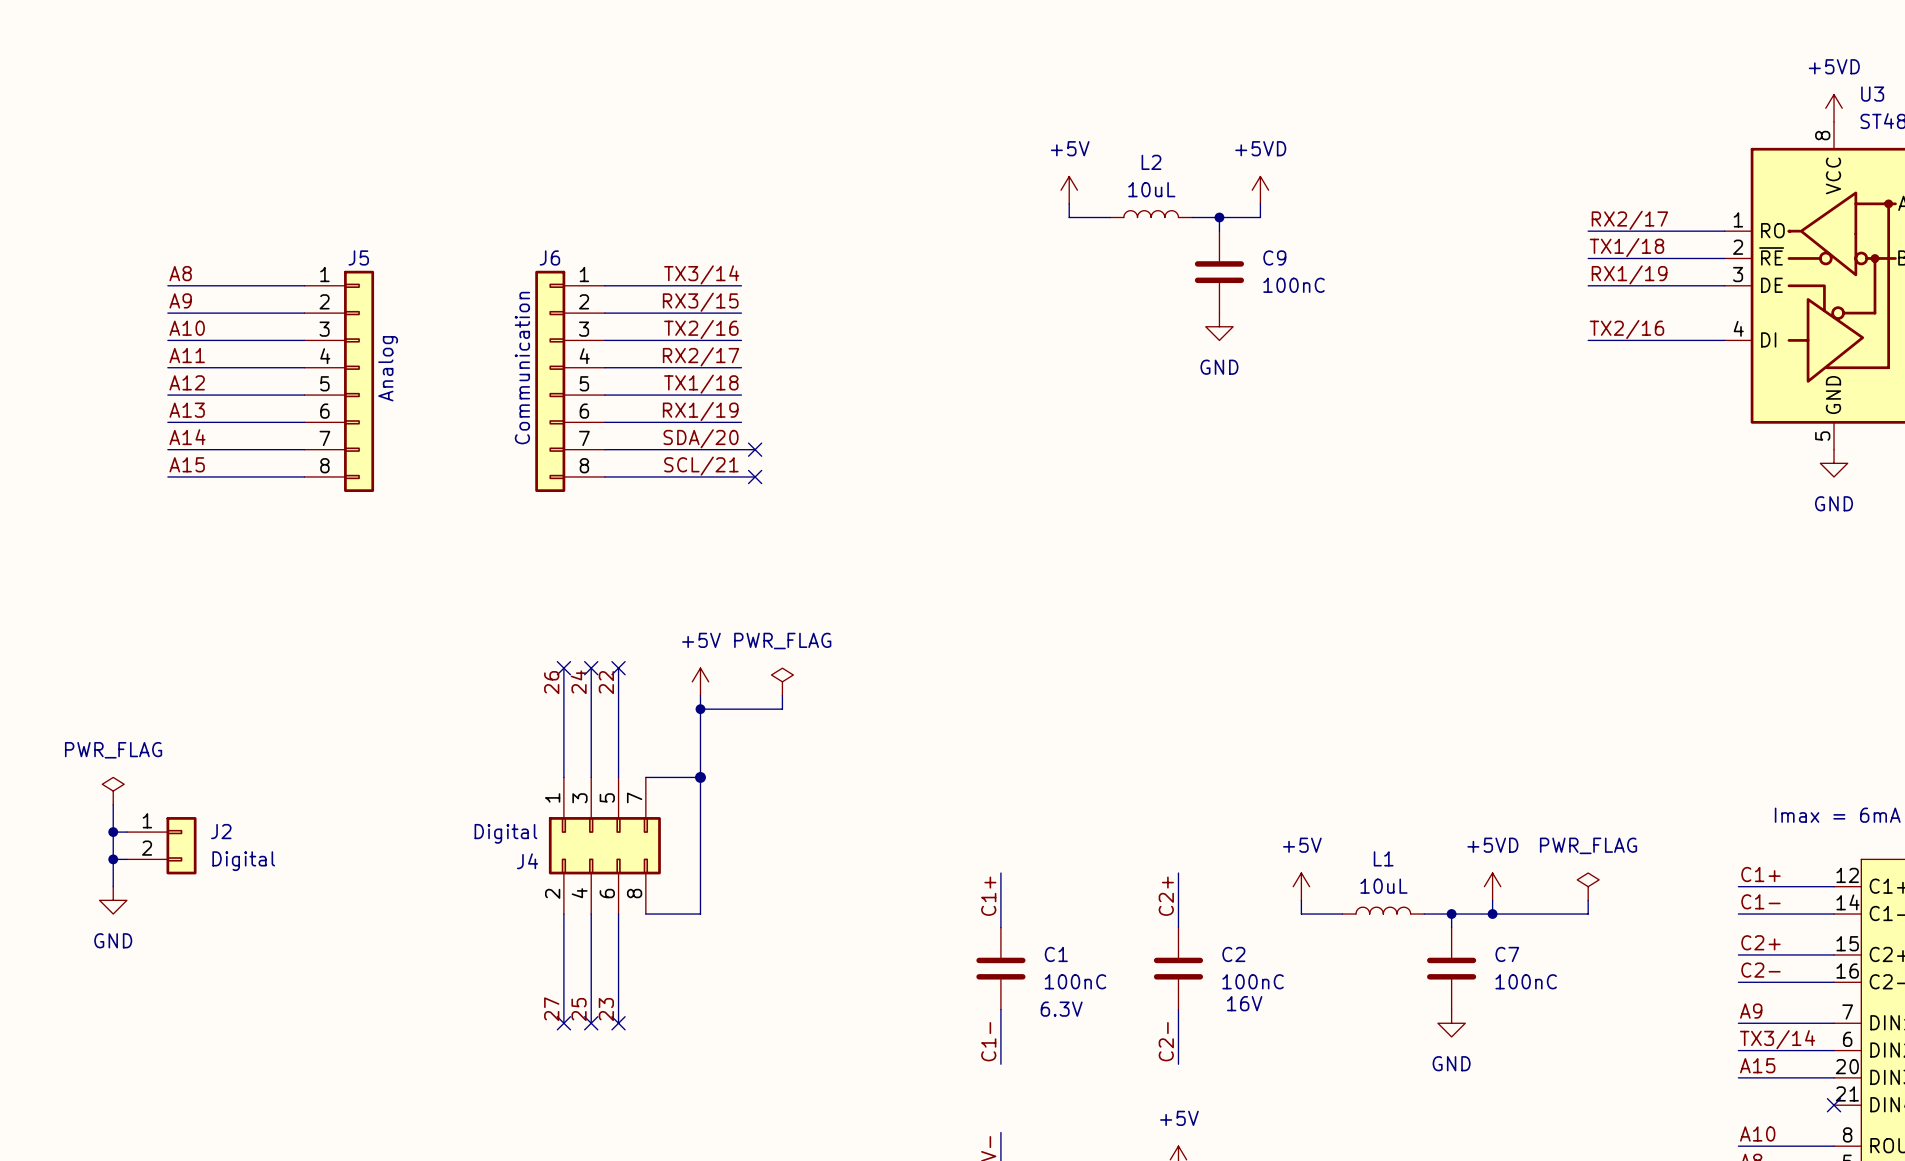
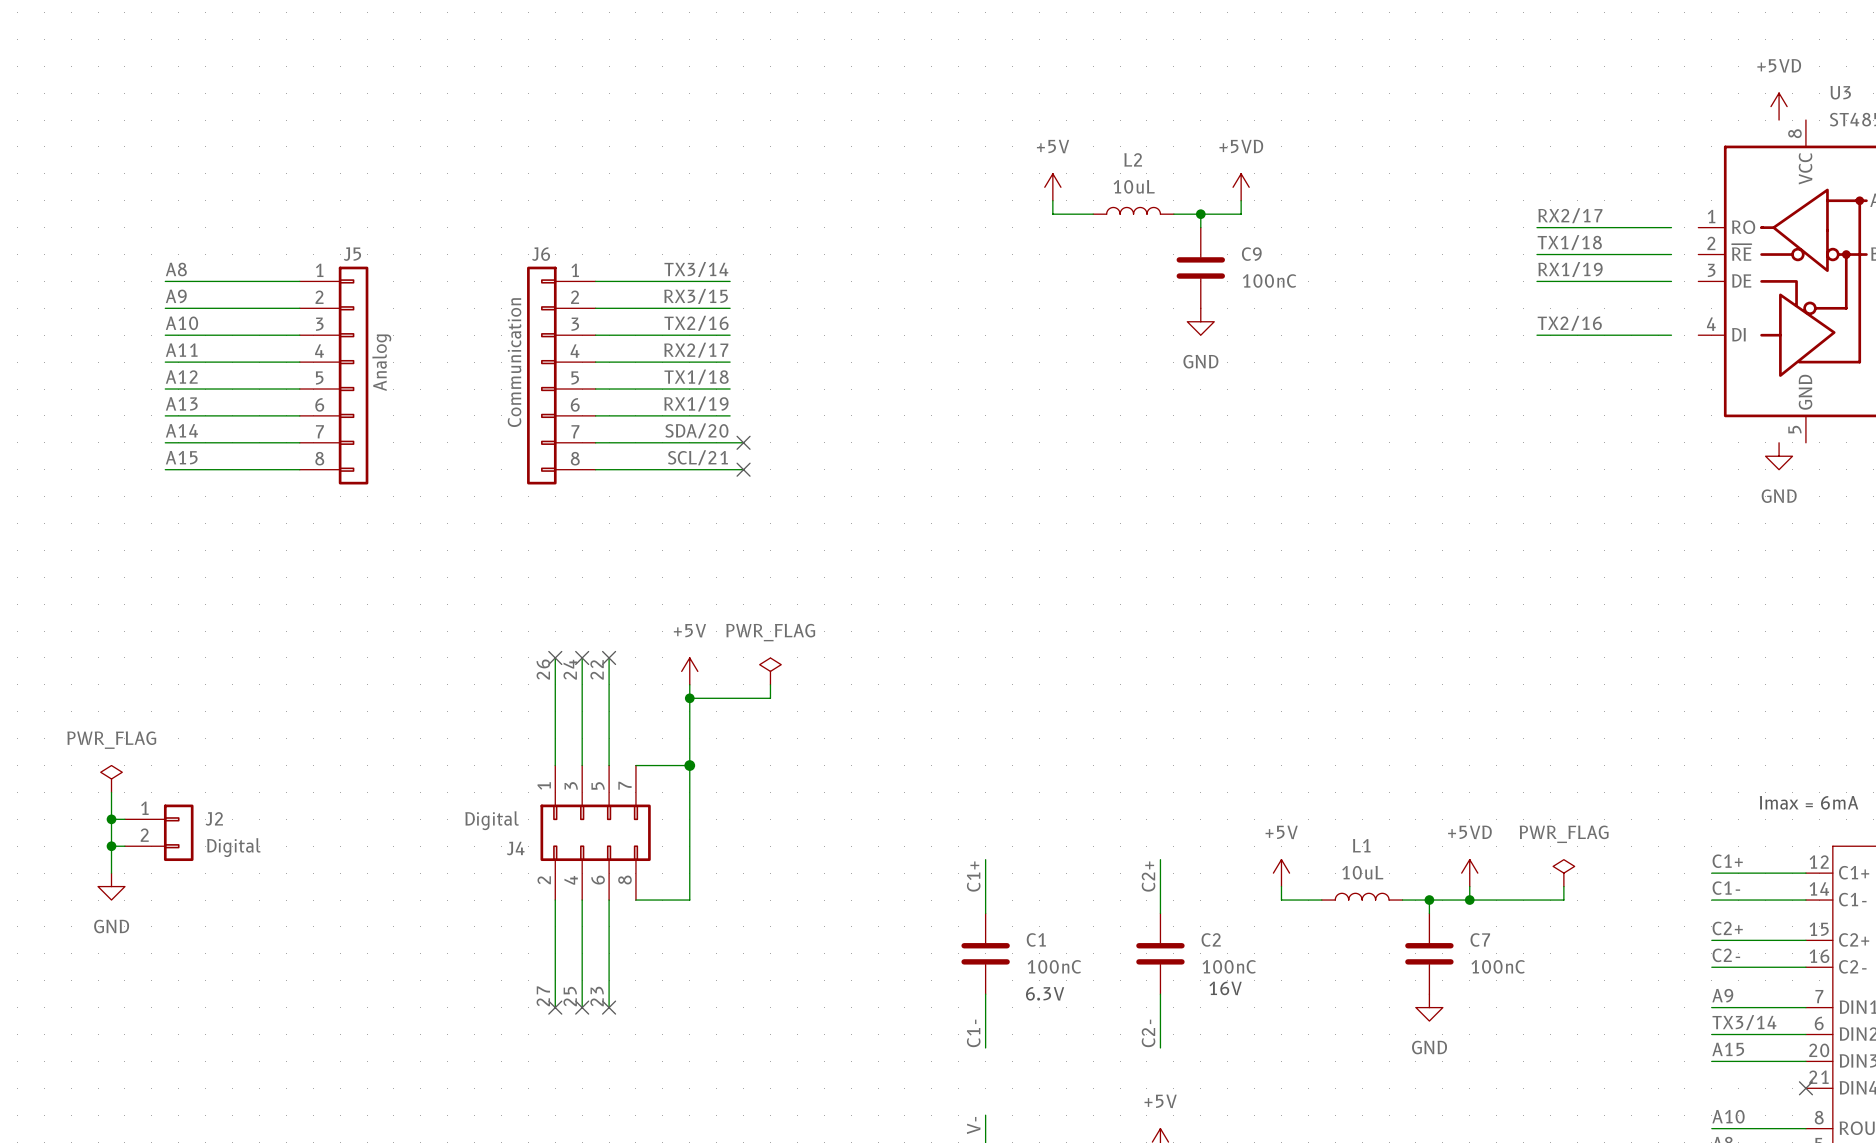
power symbol position: +5VD (1834, 108) -> +5VD (1779, 106)
label position: RX2/17 (1629, 220) -> RX2/17 (1570, 215)
wire: (1697, 231) (1724, 231) -> (1536, 227) (1563, 227)
label position: TX1/18 (1626, 247) -> TX1/18 (1569, 242)
wire: (1697, 258) (1724, 258) -> (1536, 254) (1563, 254)
label position: RX1/19 (1629, 274) -> RX1/19 (1570, 269)
wire: (1697, 285) (1724, 285) -> (1536, 281) (1563, 281)
label position: TX2/16 (1626, 329) -> TX2/16 (1569, 323)
wire: (1697, 340) (1724, 340) -> (1536, 335) (1563, 335)
power symbol position: GND (1834, 463) -> GND (1779, 456)

